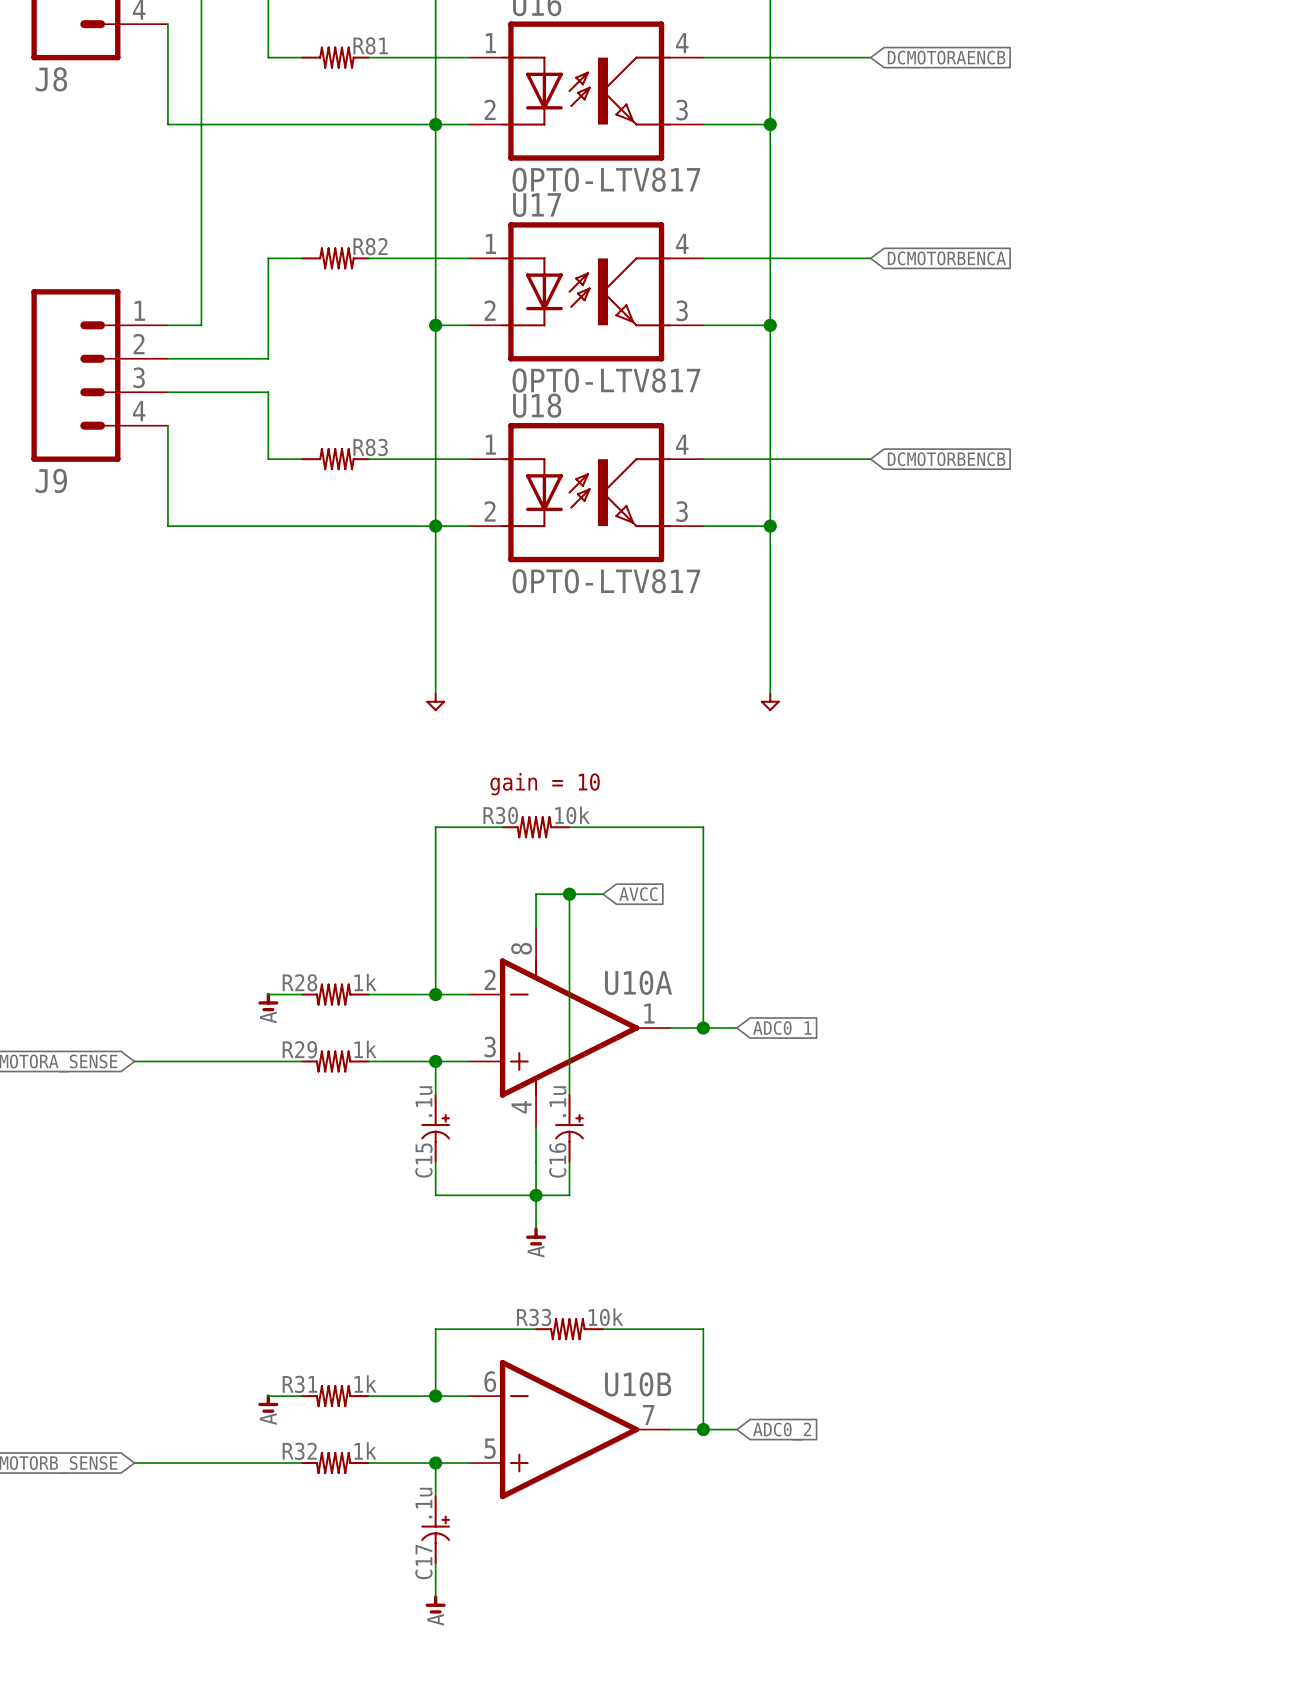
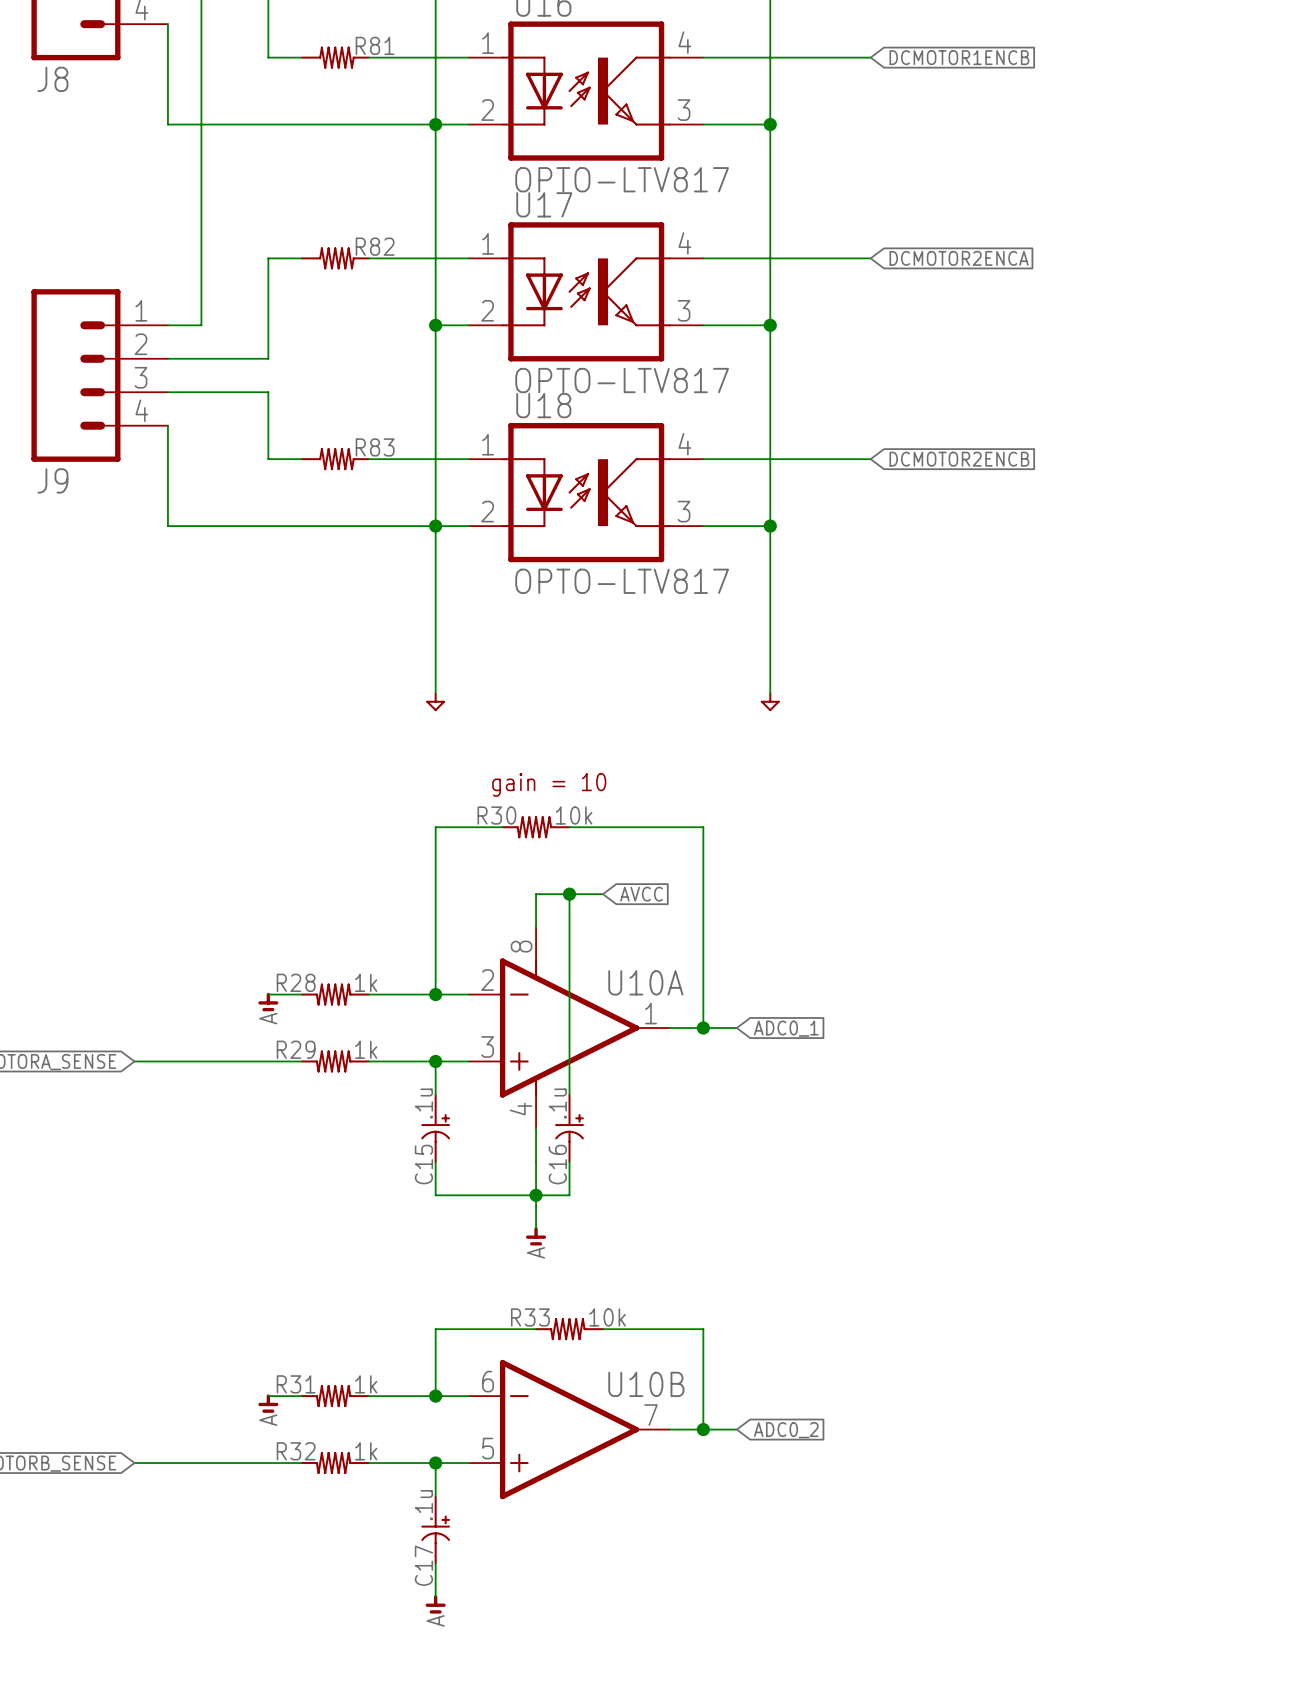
global label: DCMOTORAENCB (946, 57) -> DCMOTOR1ENCB (959, 57)
global label: DCMOTORBENCA (946, 258) -> DCMOTOR2ENCA (959, 258)
global label: DCMOTORBENCB (946, 459) -> DCMOTOR2ENCB (959, 459)

